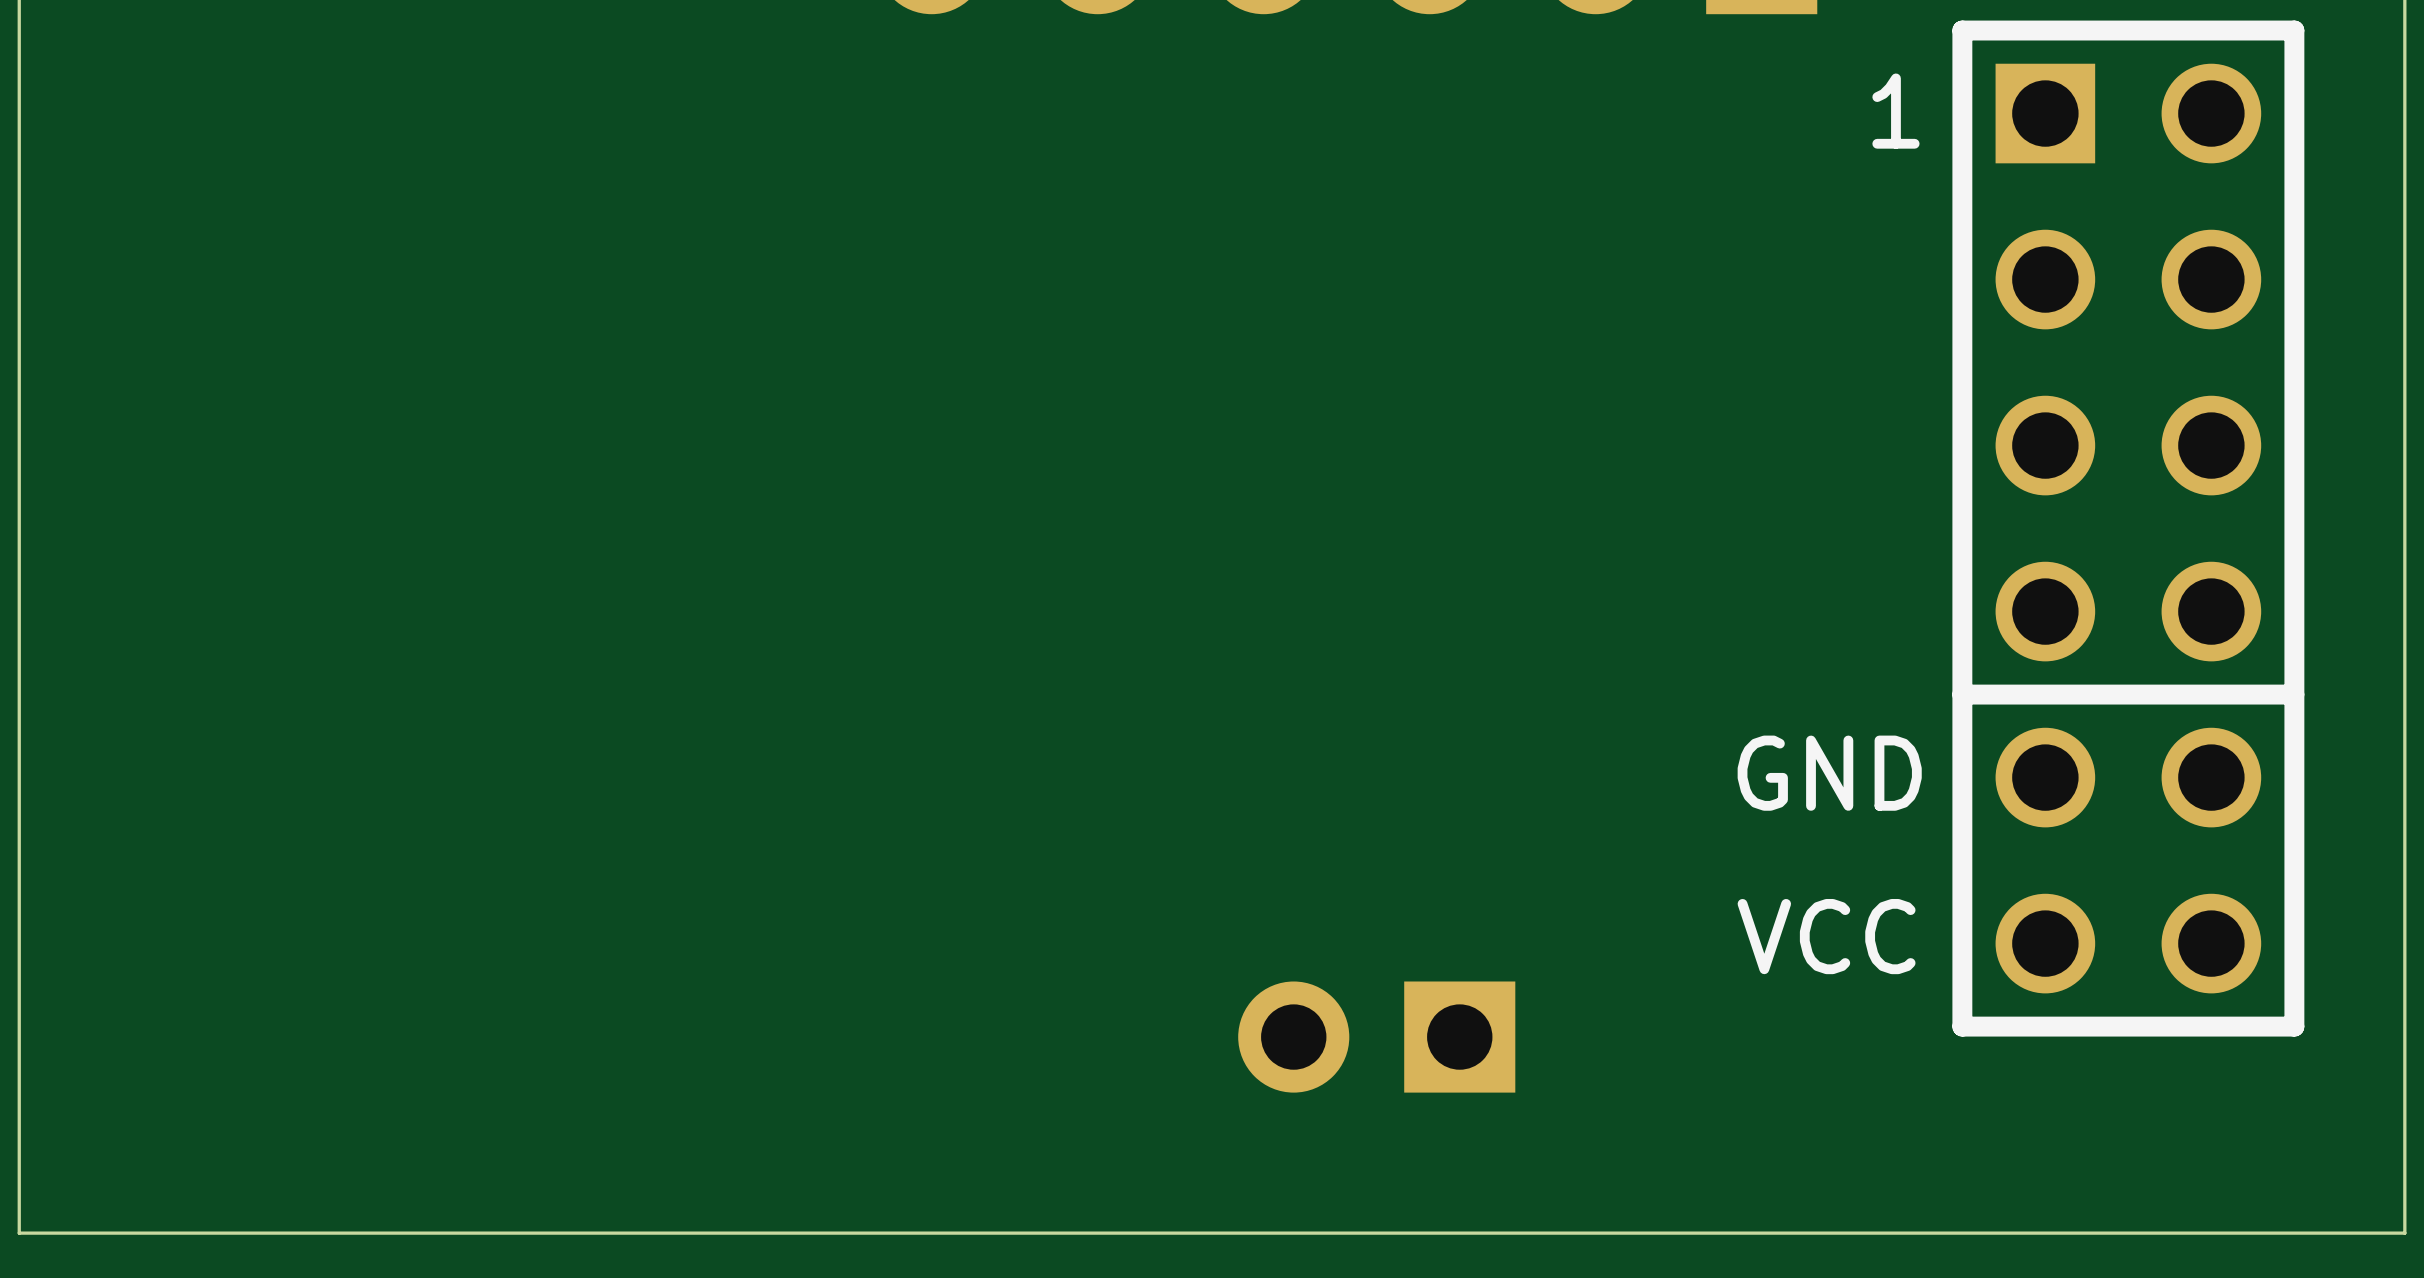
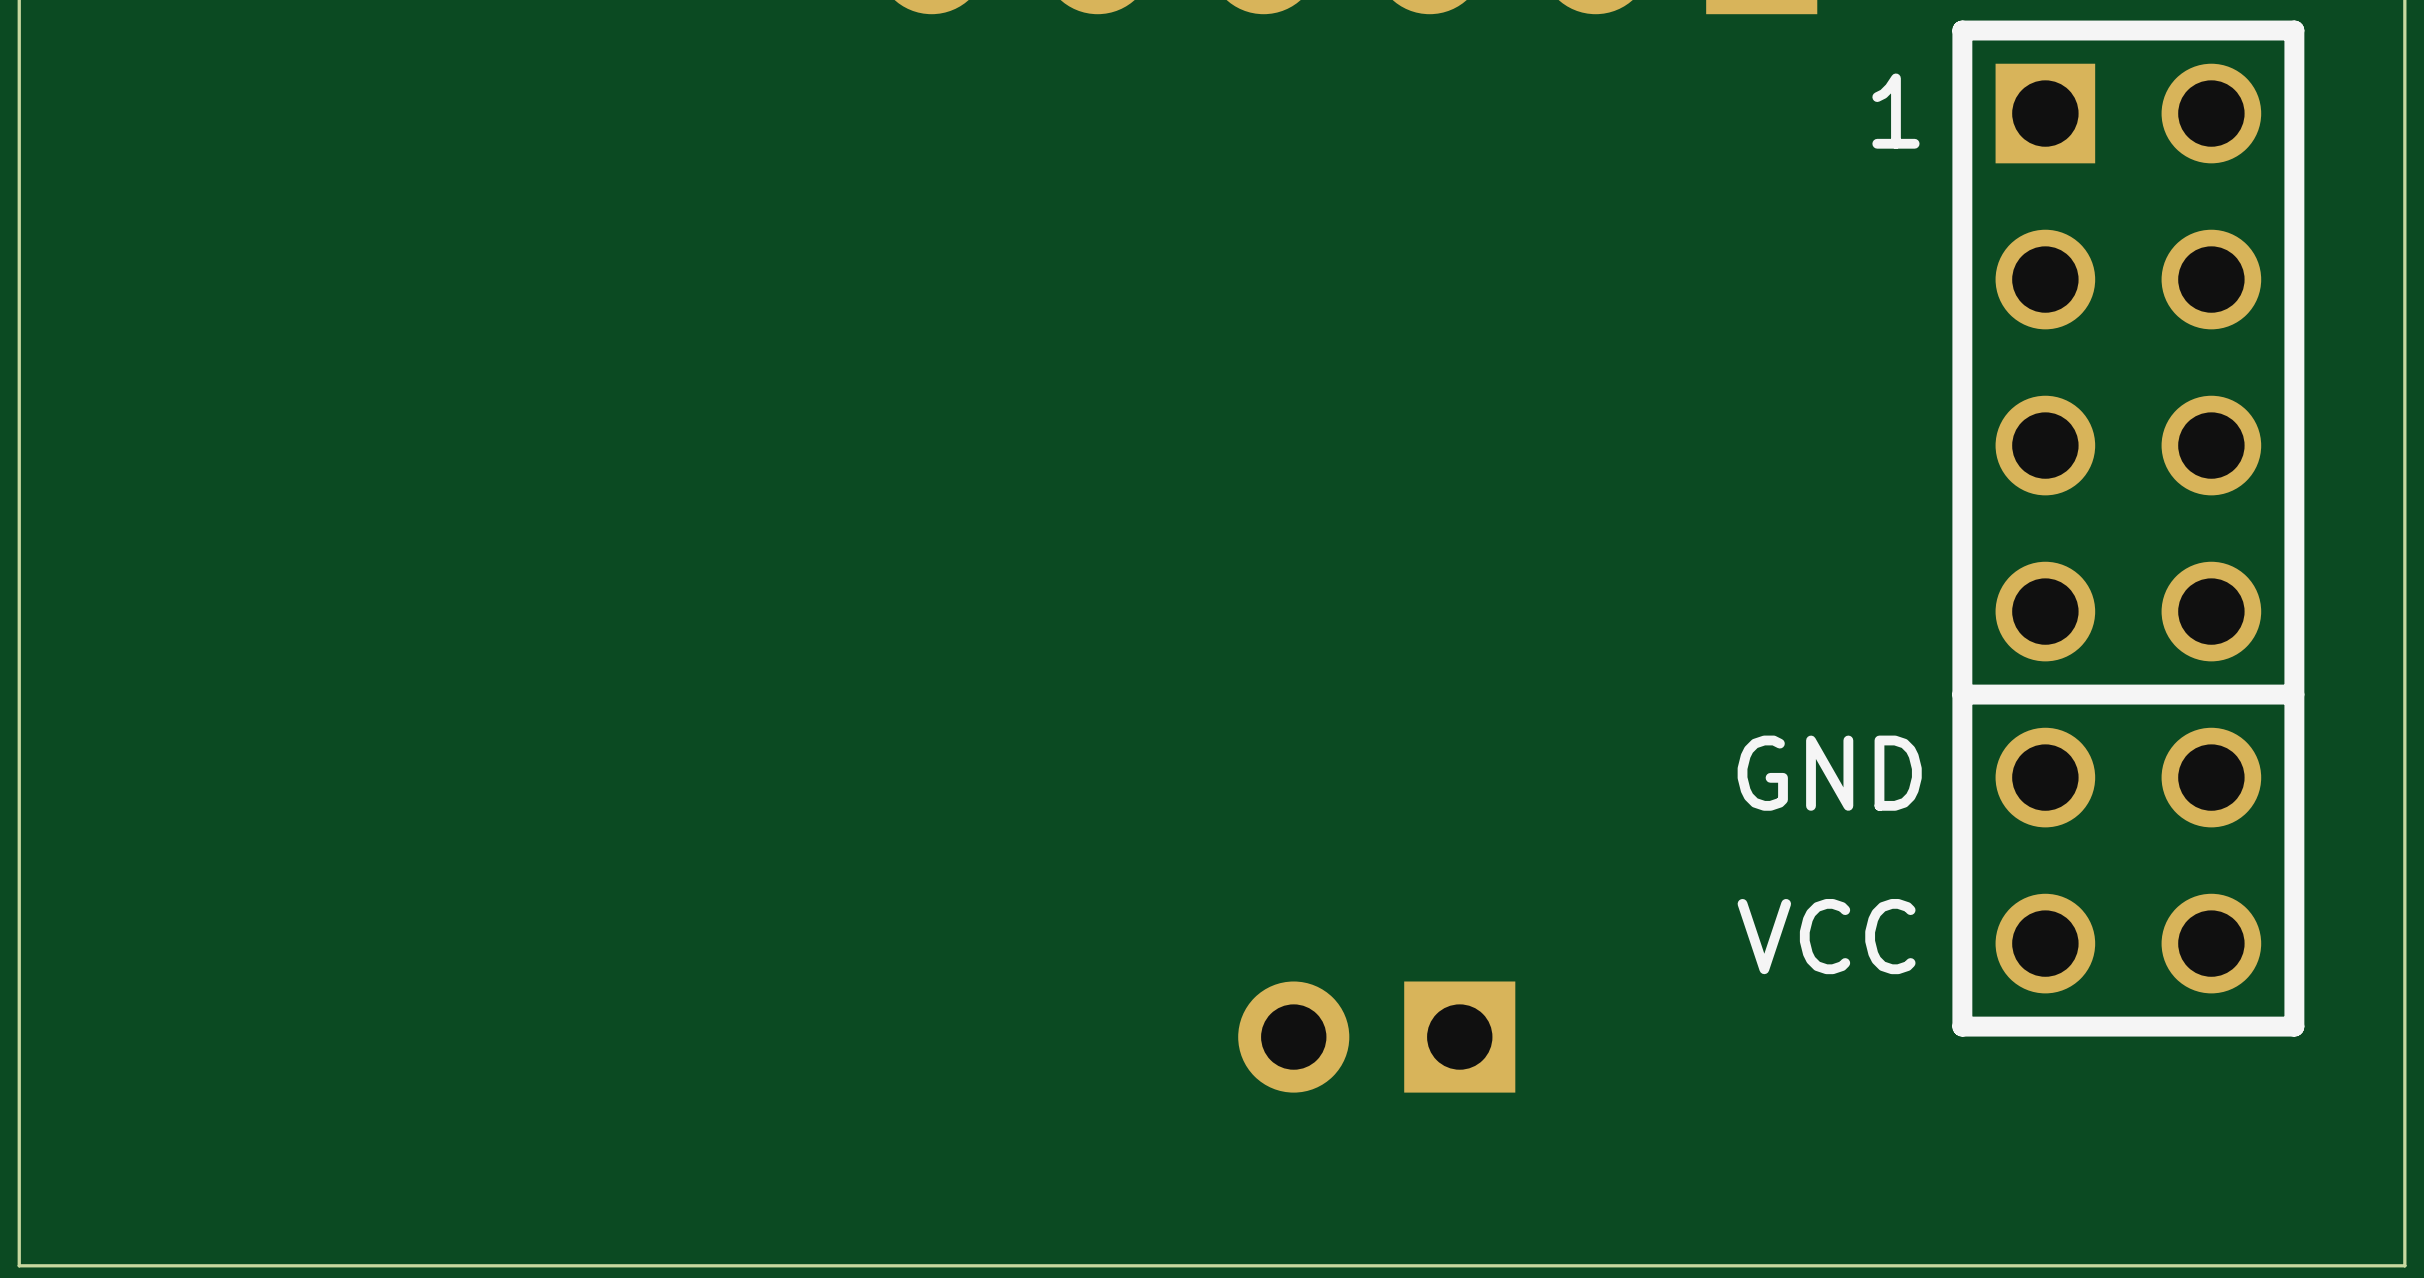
board edge: (2404, 1233) (19, 1233) -> (2404, 1233) (2404, 1265) (19, 1265) (19, 1233)

